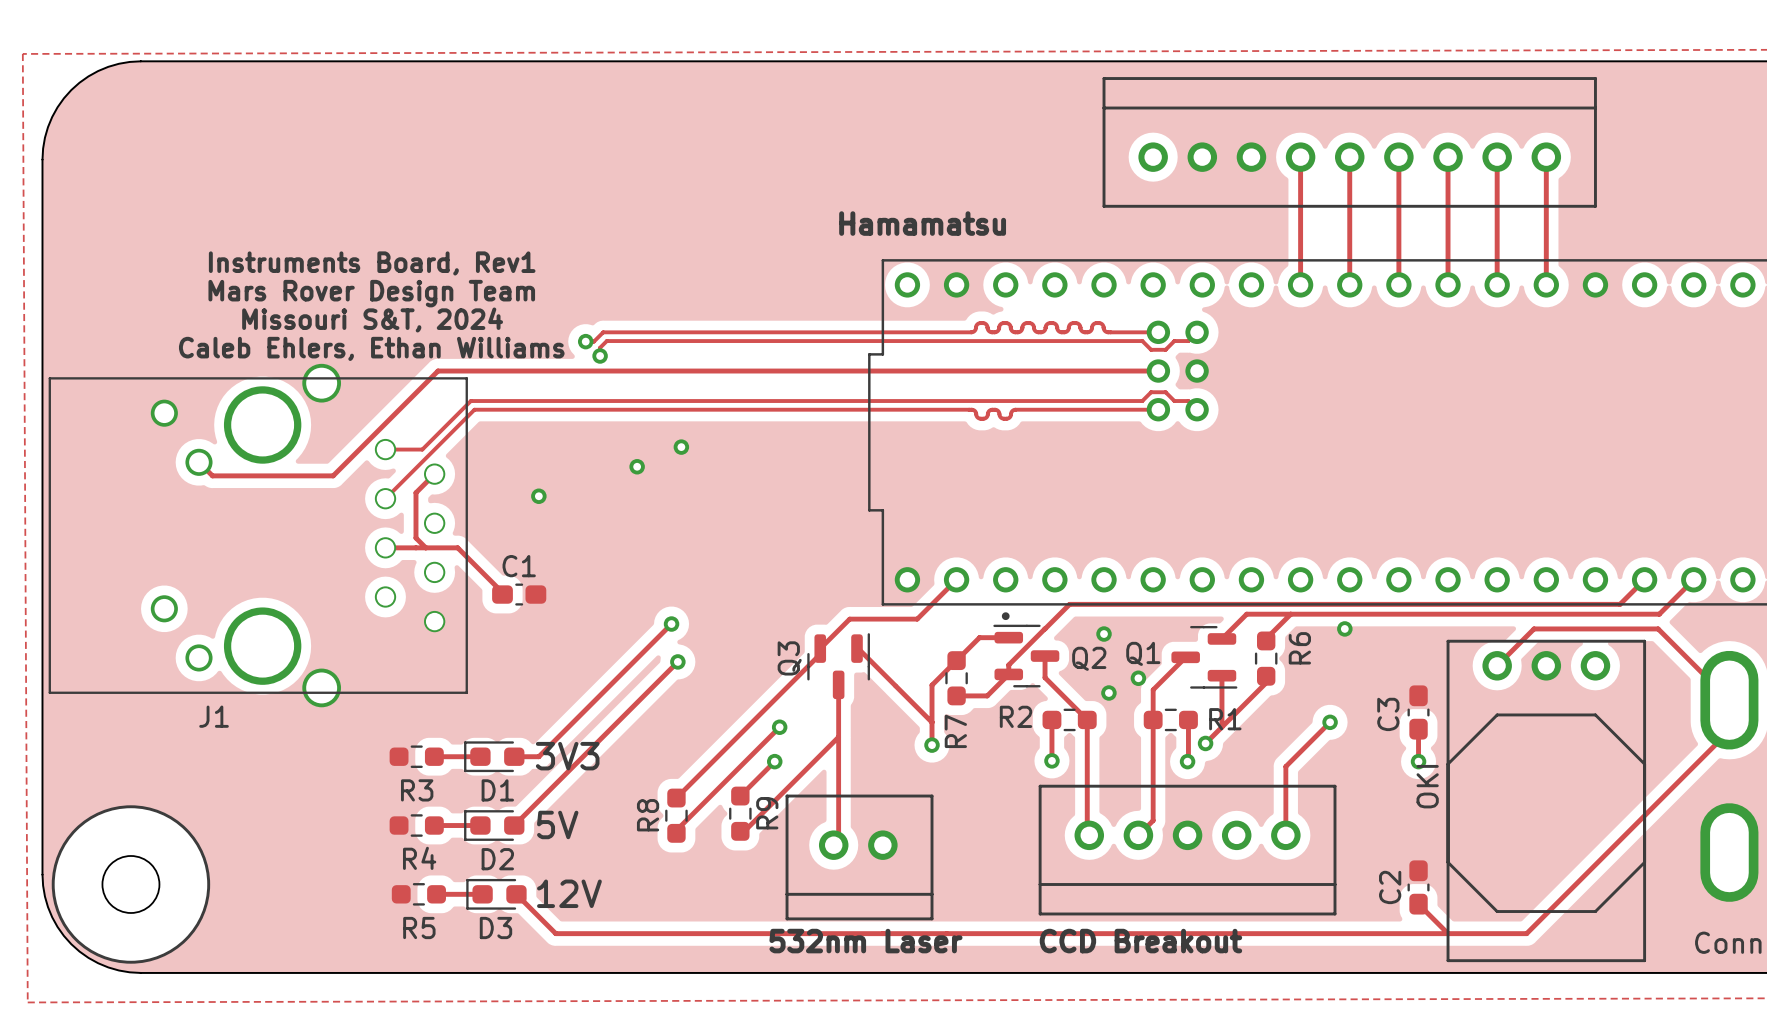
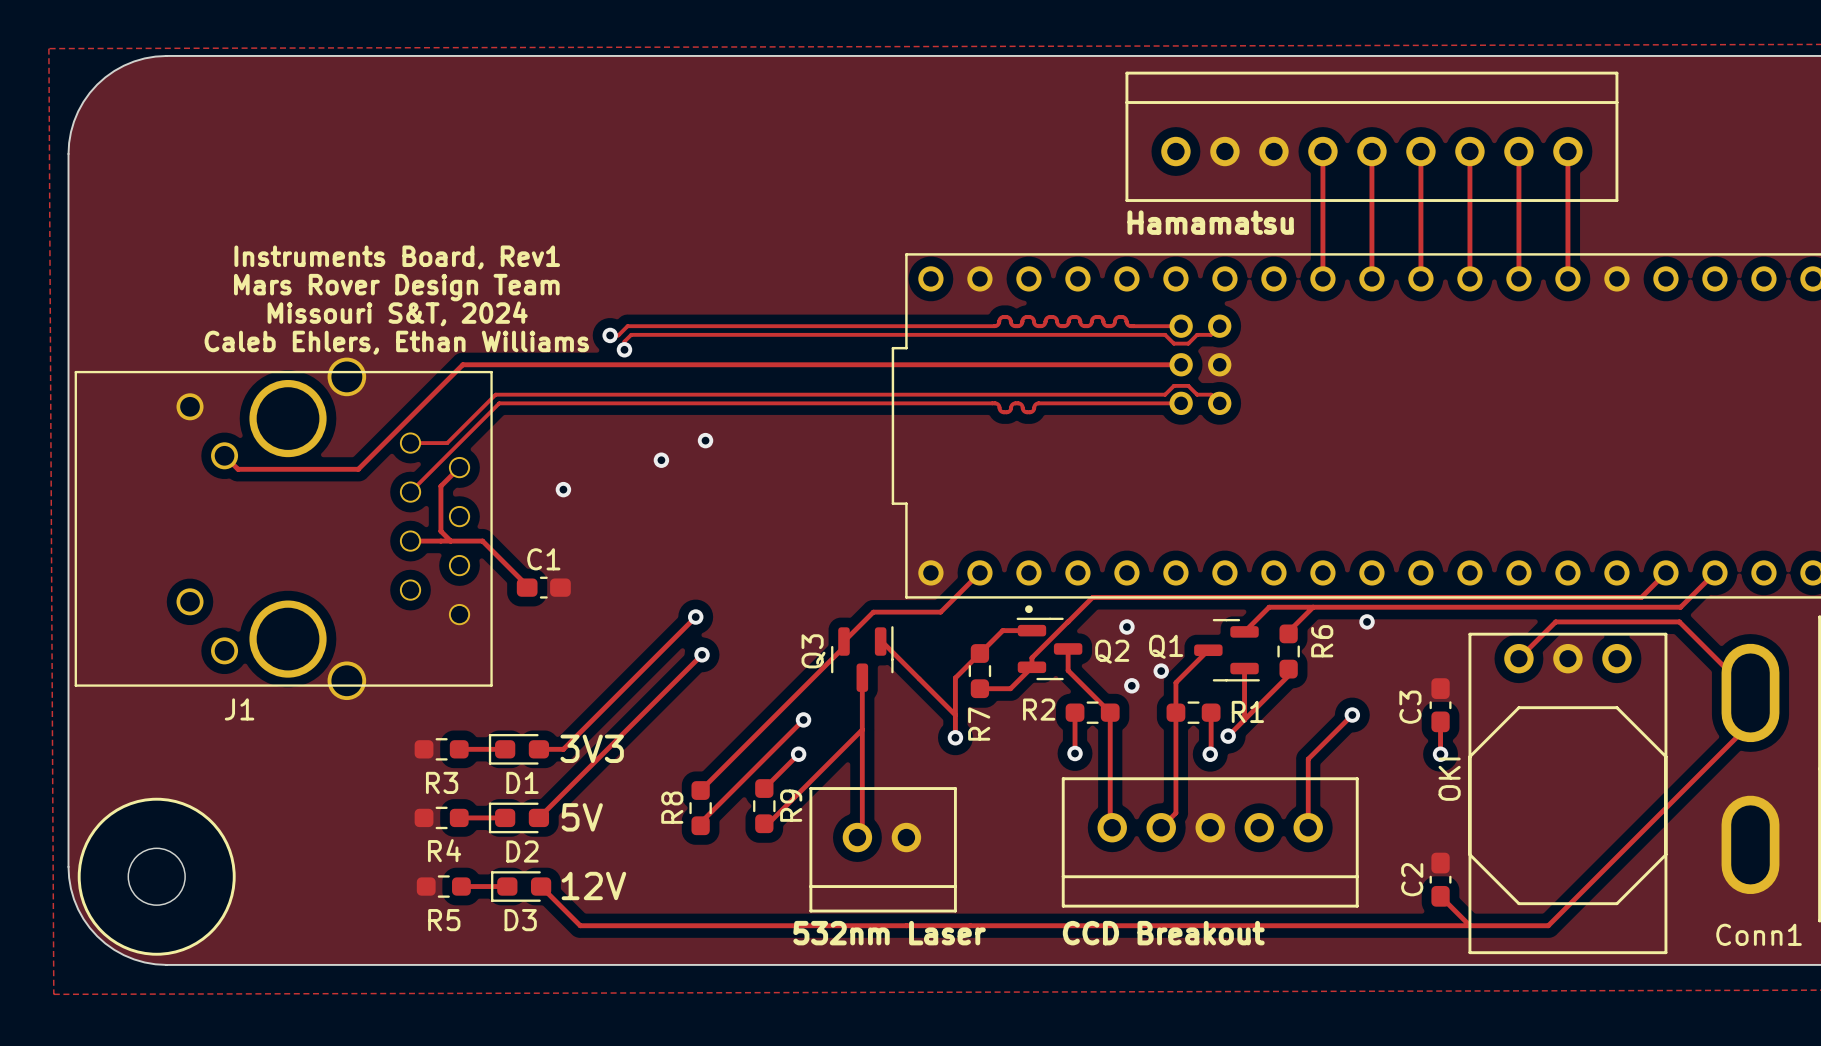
text position: Hamamatsu (922, 223) -> Hamamatsu (1210, 222)

